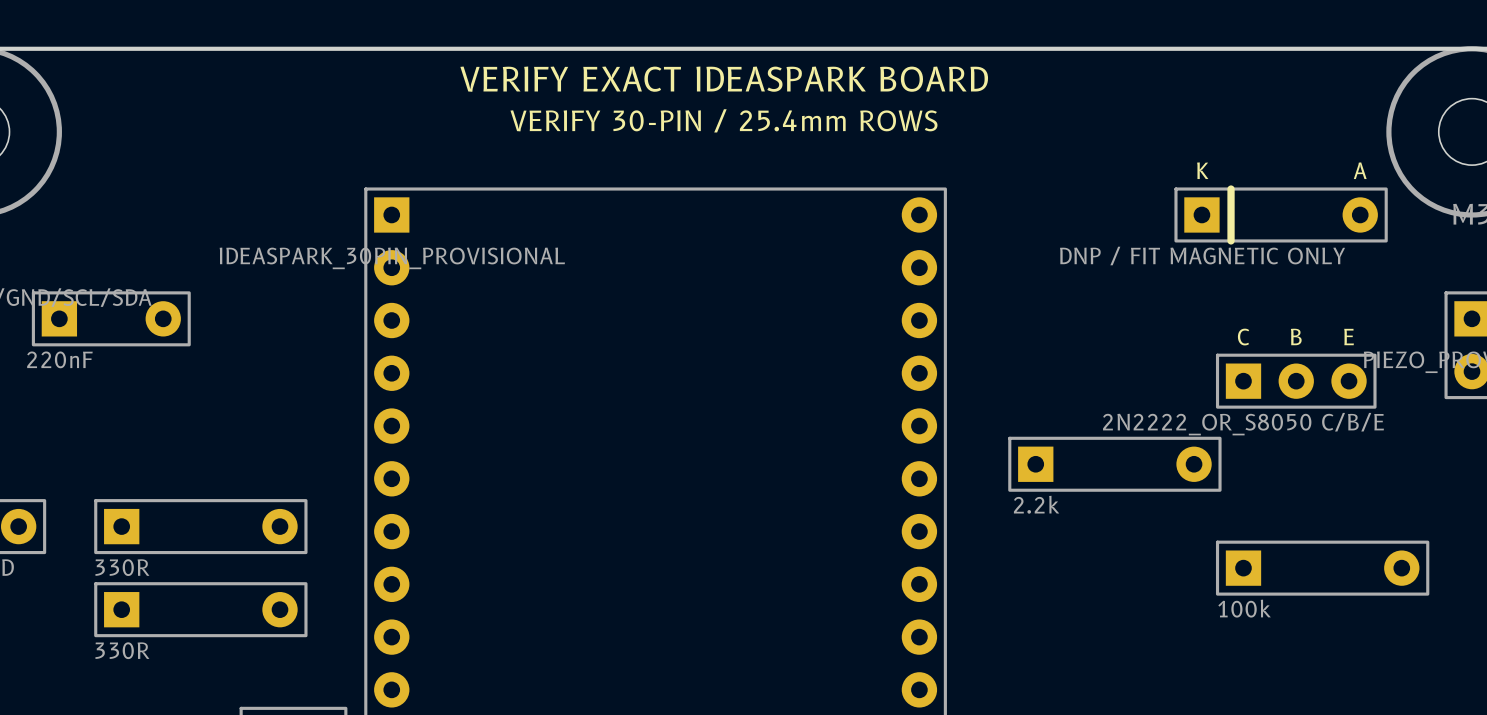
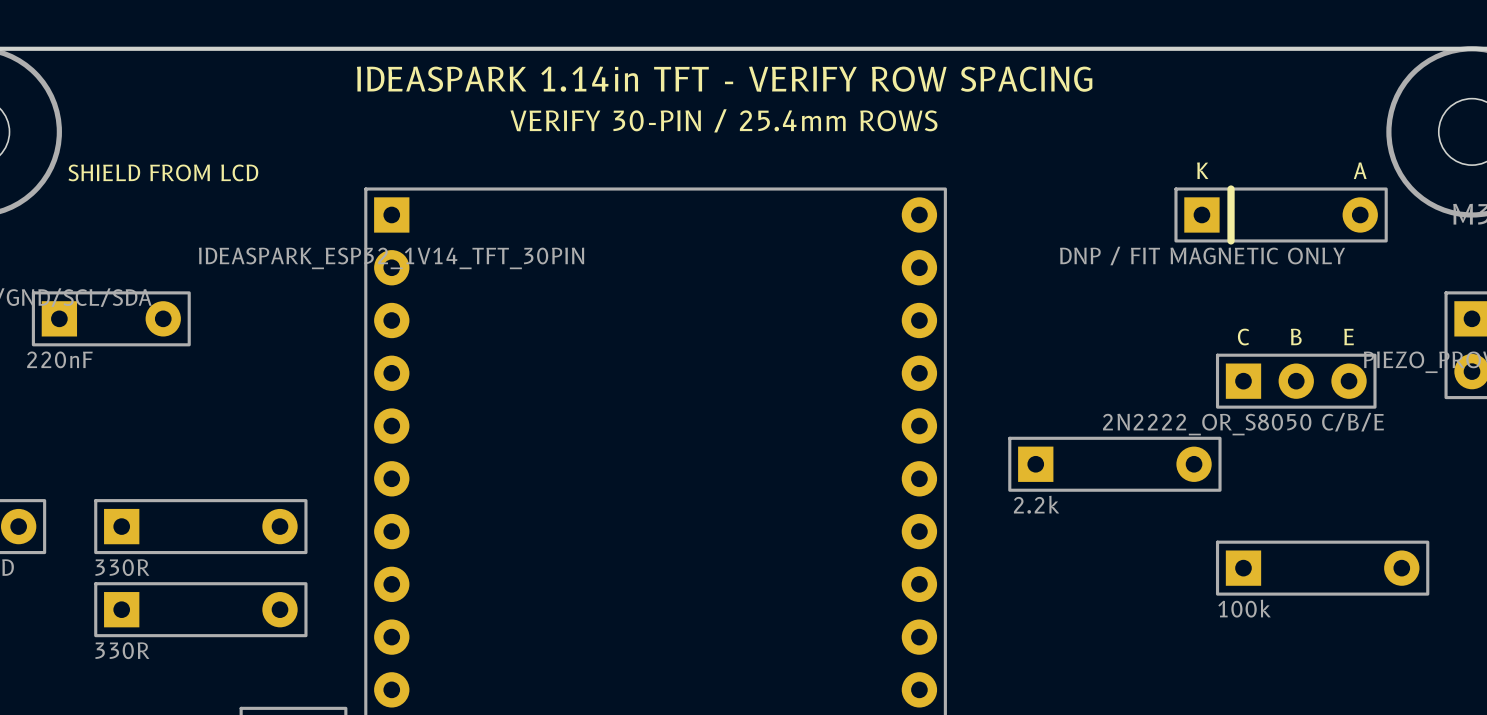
text: VERIFY EXACT IDEASPARK BOARD (724, 79) -> IDEASPARK 1.14in TFT - VERIFY ROW SPACING (724, 79)
text: none -> SHIELD FROM LCD (163, 172)
part value: IDEASPARK_30PIN_PROVISIONAL (392, 258) -> IDEASPARK_ESP32_1V14_TFT_30PIN (391, 258)

